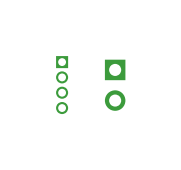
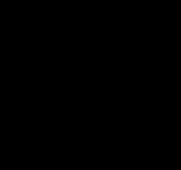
part: (62, 85) -> none
part: (115, 85) -> none

